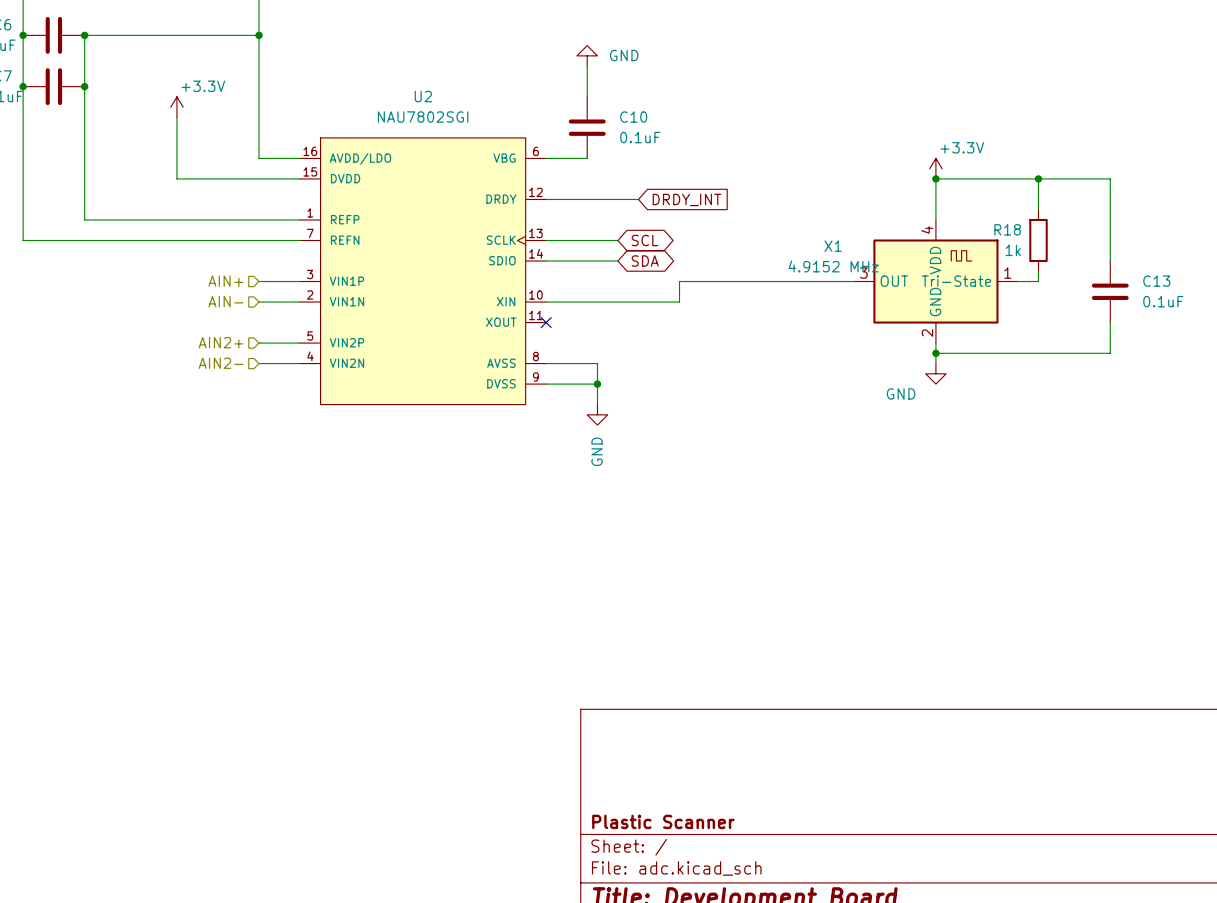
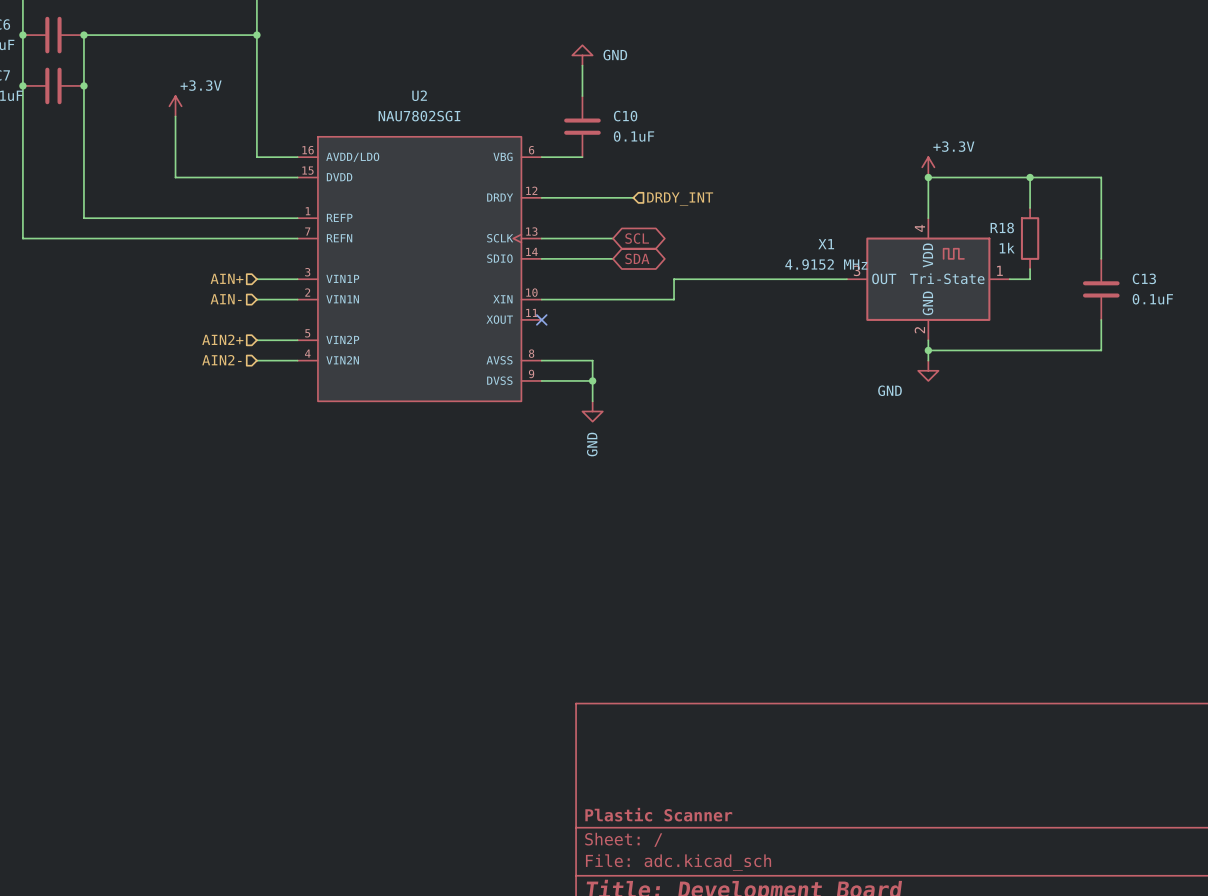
global label: DRDY_INT (686, 199) -> none
hierarchical label: none -> DRDY_INT (680, 199)

